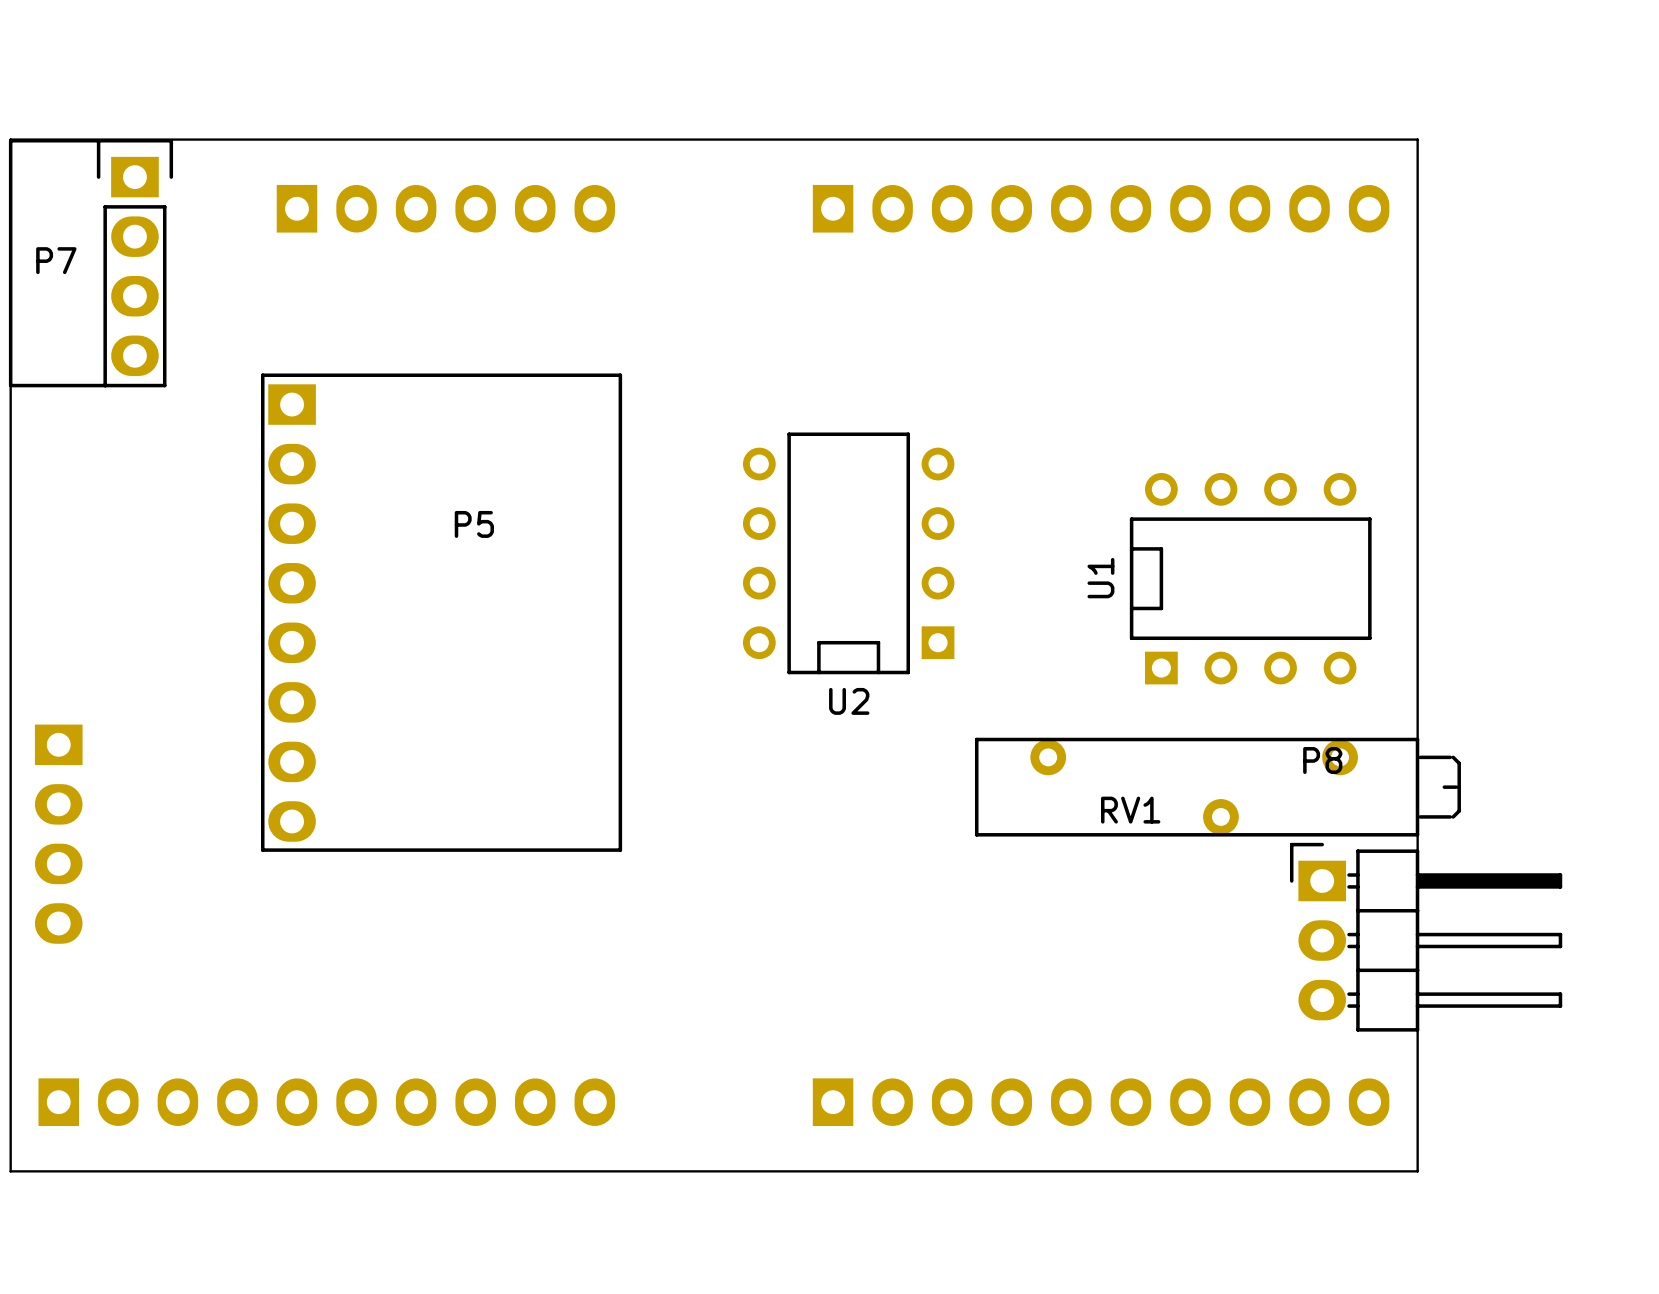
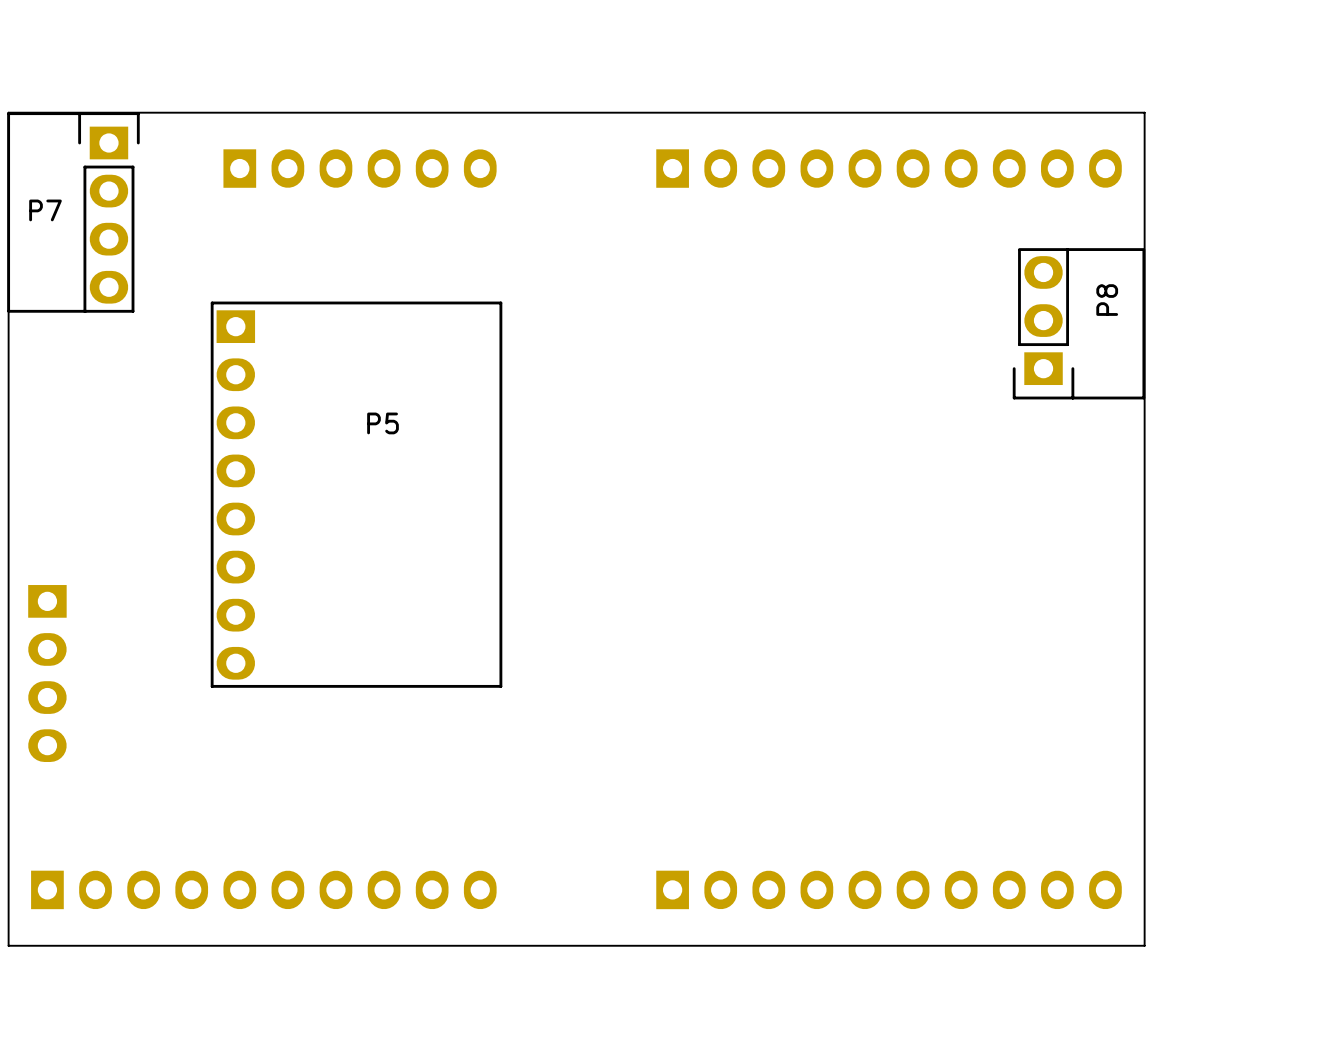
U2: (848, 553) -> none
U1: (1250, 578) -> none
P8 name position: P8 (1322, 760) -> P8 (1107, 300)
RV1: (1217, 787) -> none
P8 footprint: [1289, 842, 1563, 1032] -> [1012, 248, 1146, 400]

